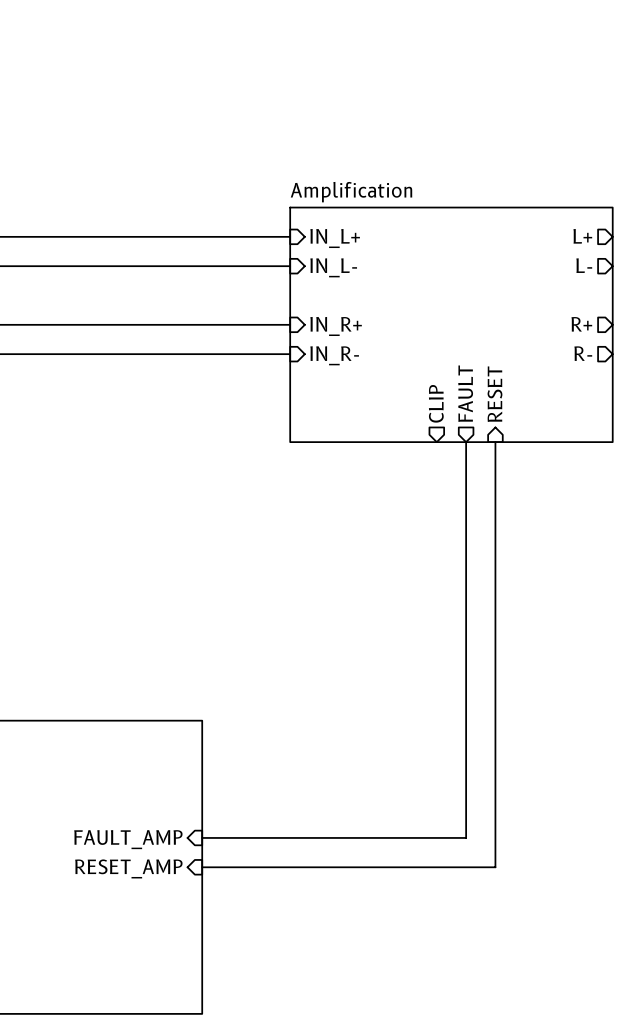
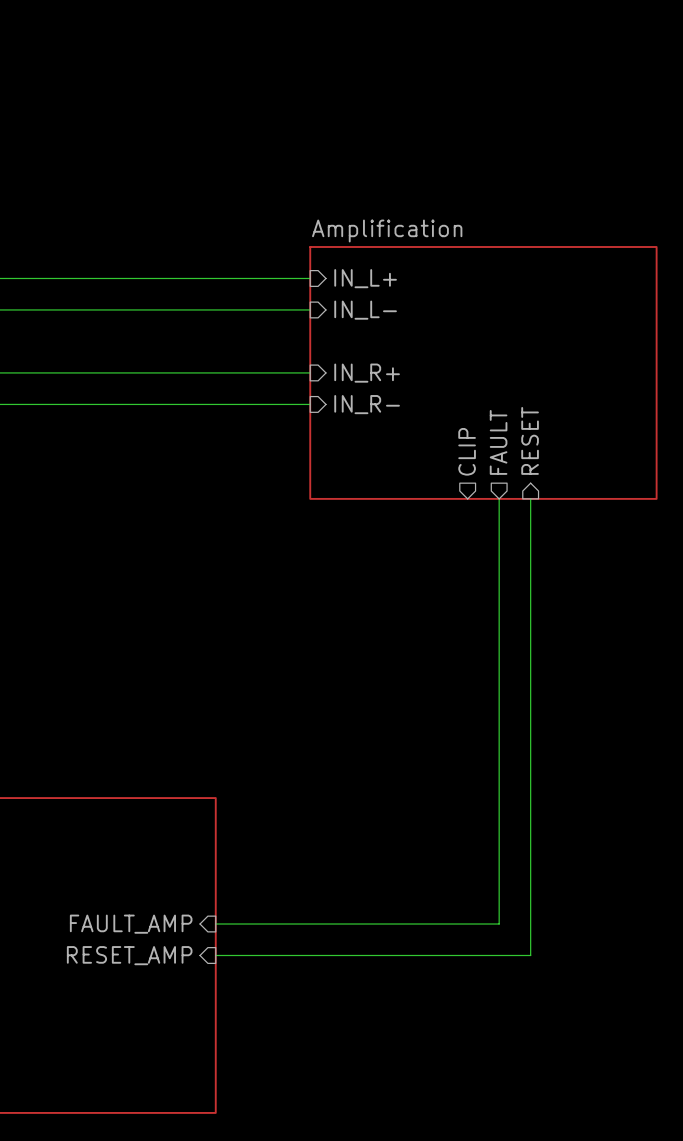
sheet pin: L+ (582, 236) -> none
sheet pin: L- (584, 265) -> none
sheet pin: R+ (581, 324) -> none
sheet pin: R- (583, 353) -> none

